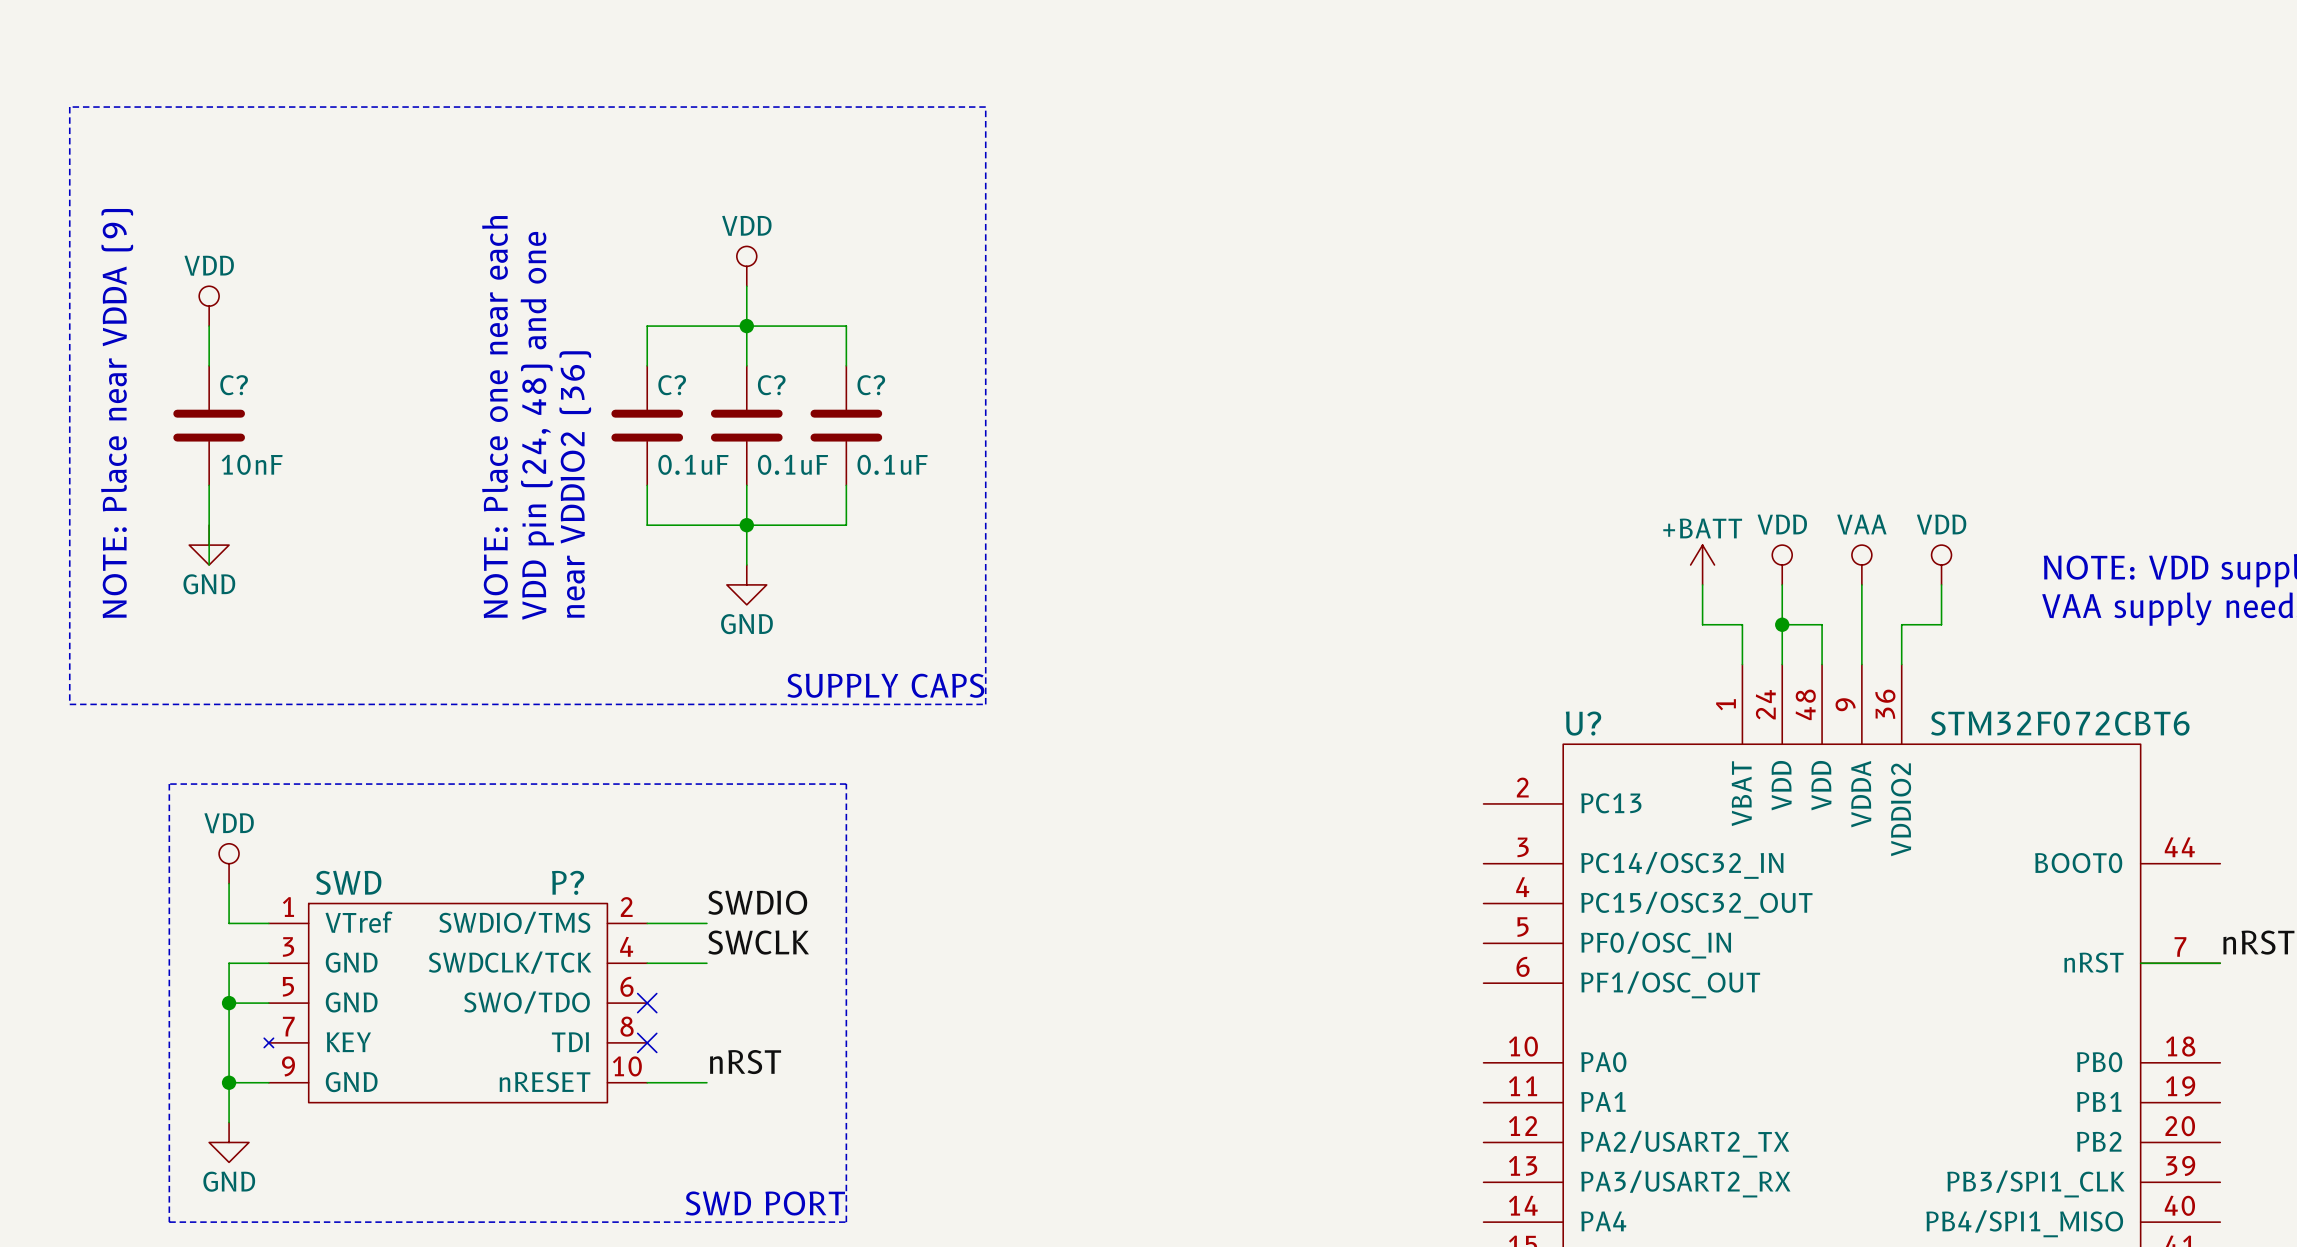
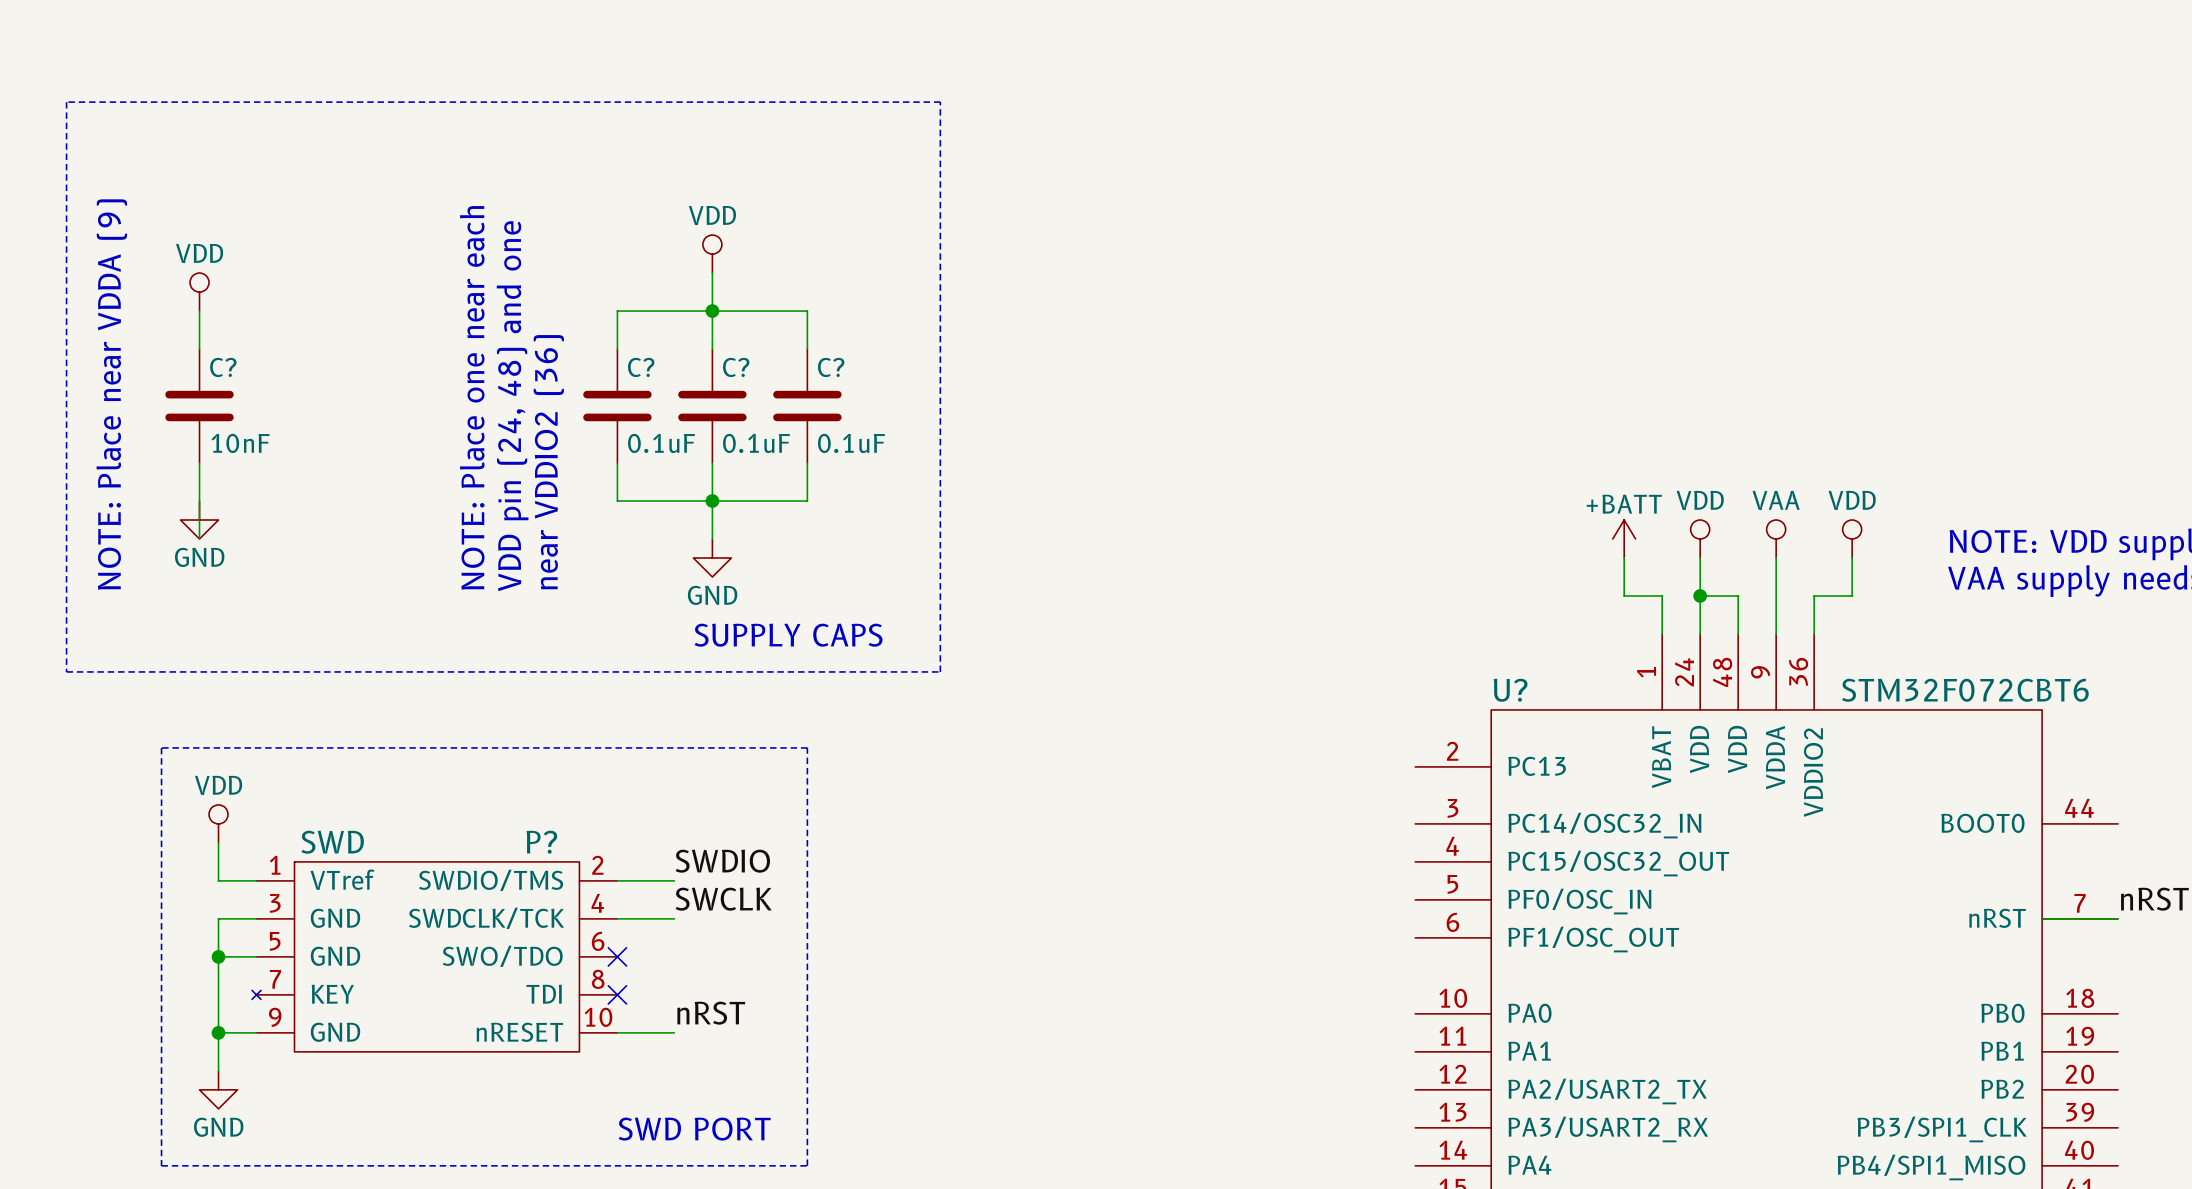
text position: SUPPLY CAPS (885, 685) -> SUPPLY CAPS (788, 635)
text position: SWD PORT (765, 1203) -> SWD PORT (694, 1129)

